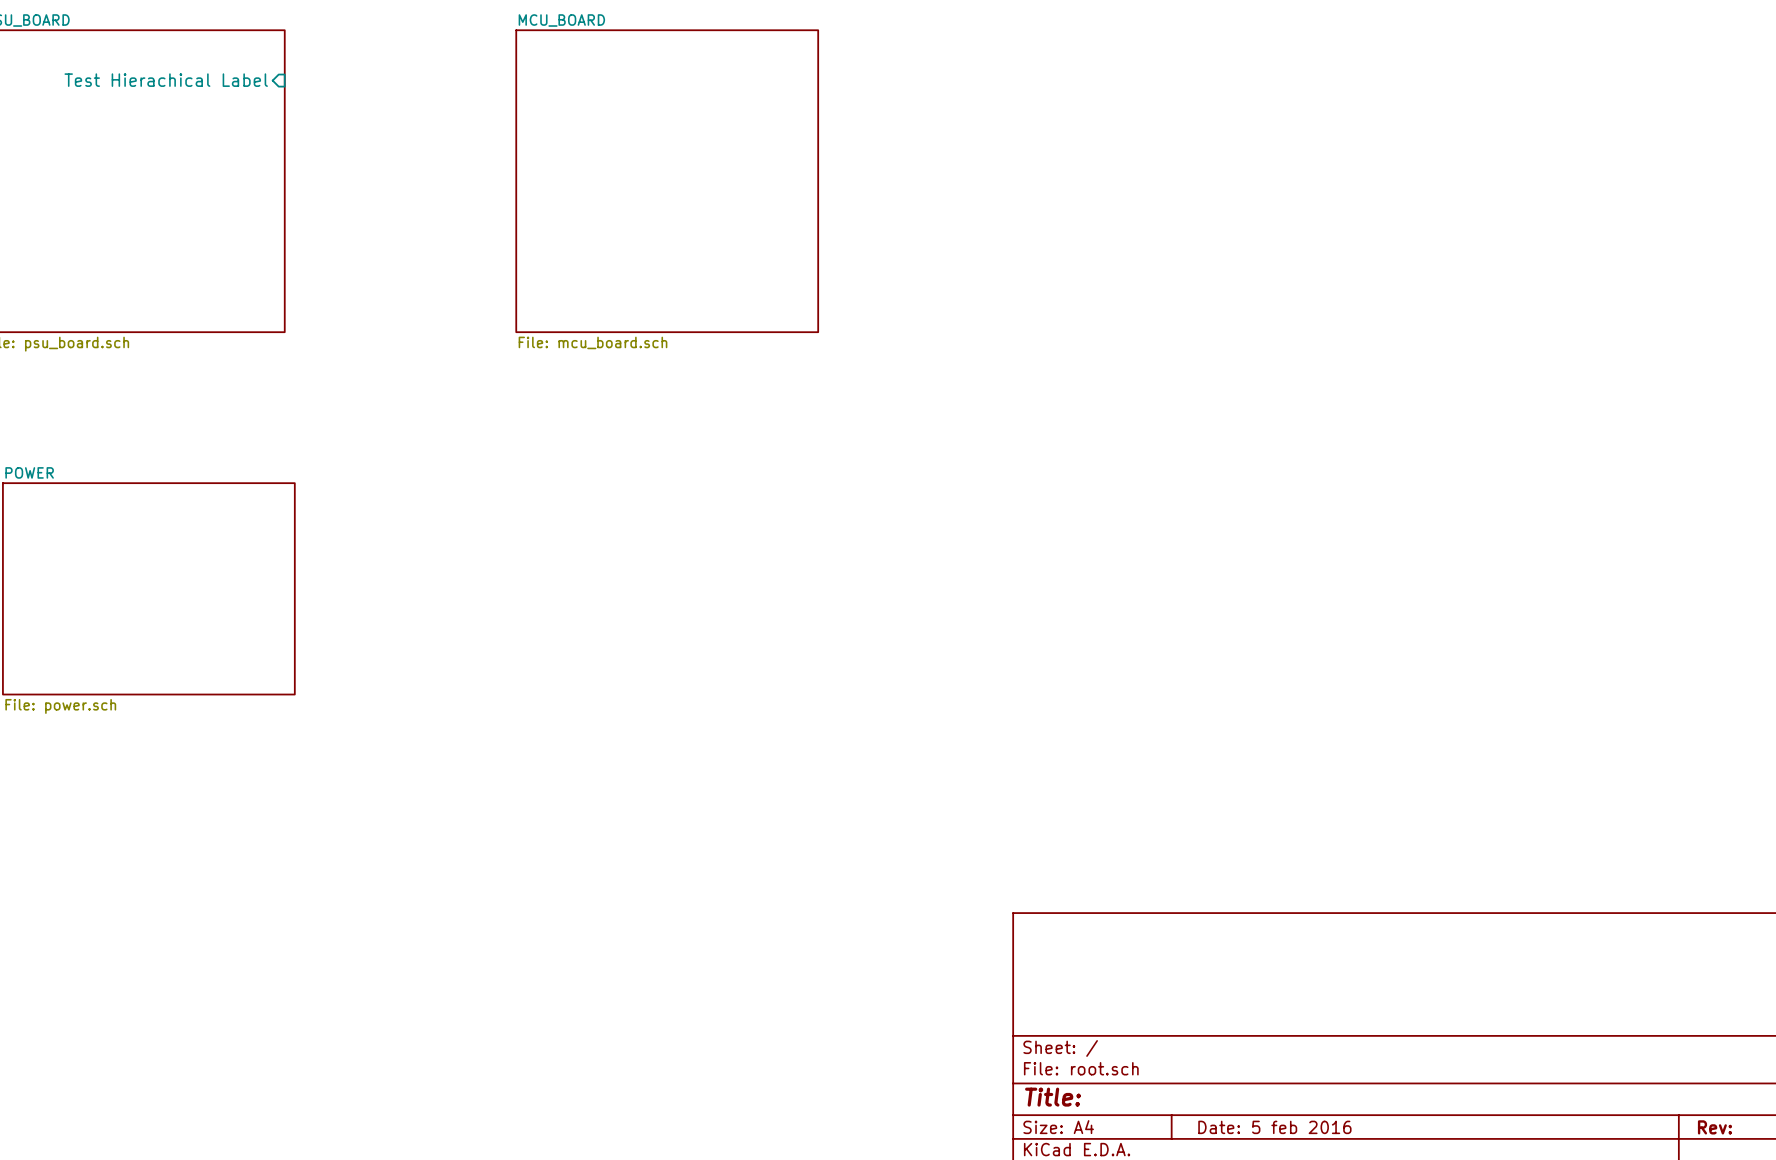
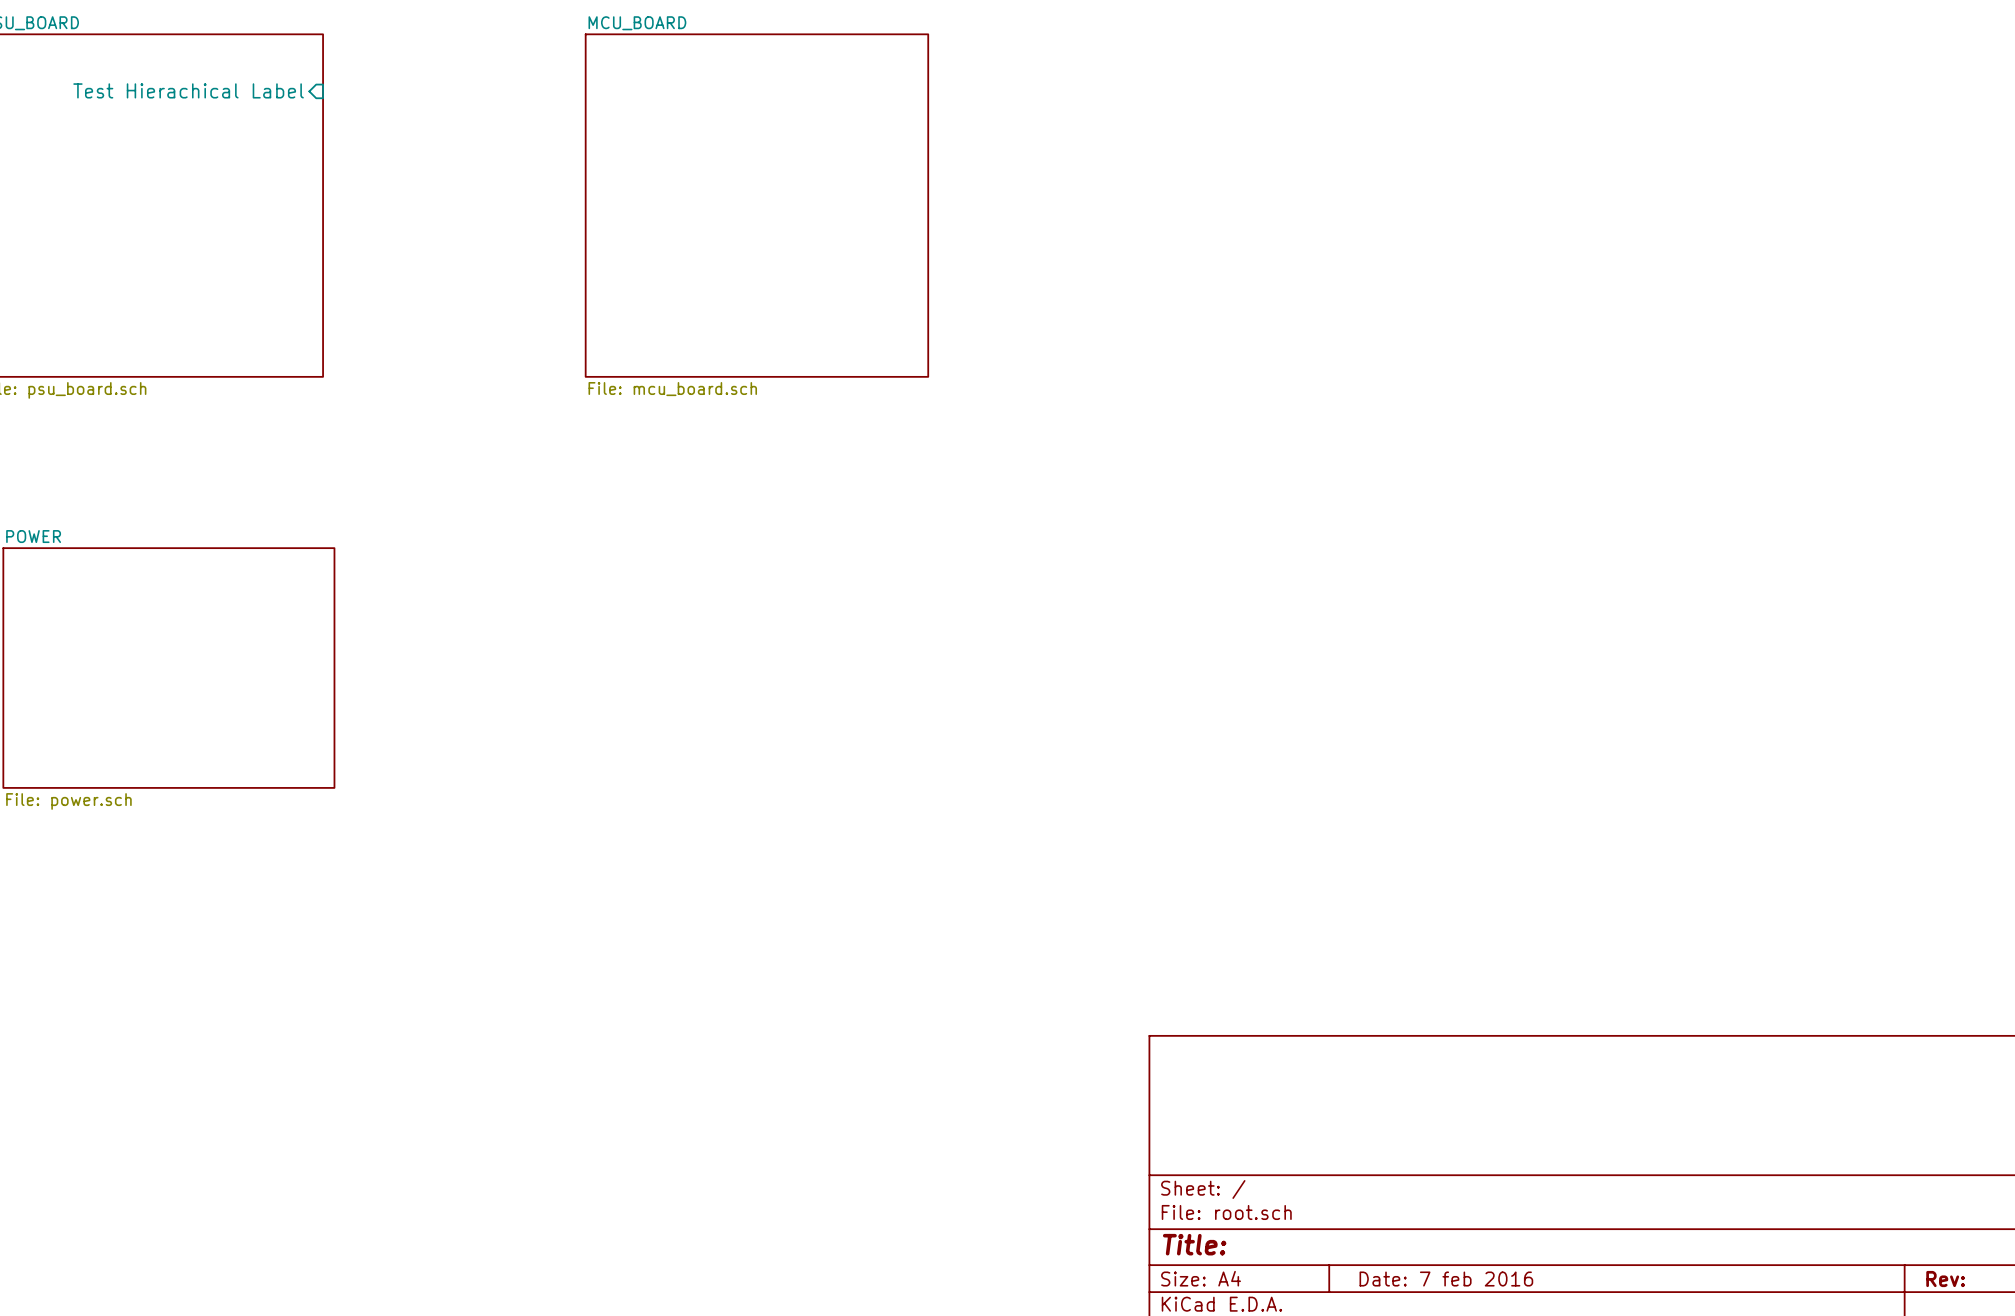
title block: Date: 5 feb 2016 (1274, 1127) -> Date: 7 feb 2016 (1446, 1279)

